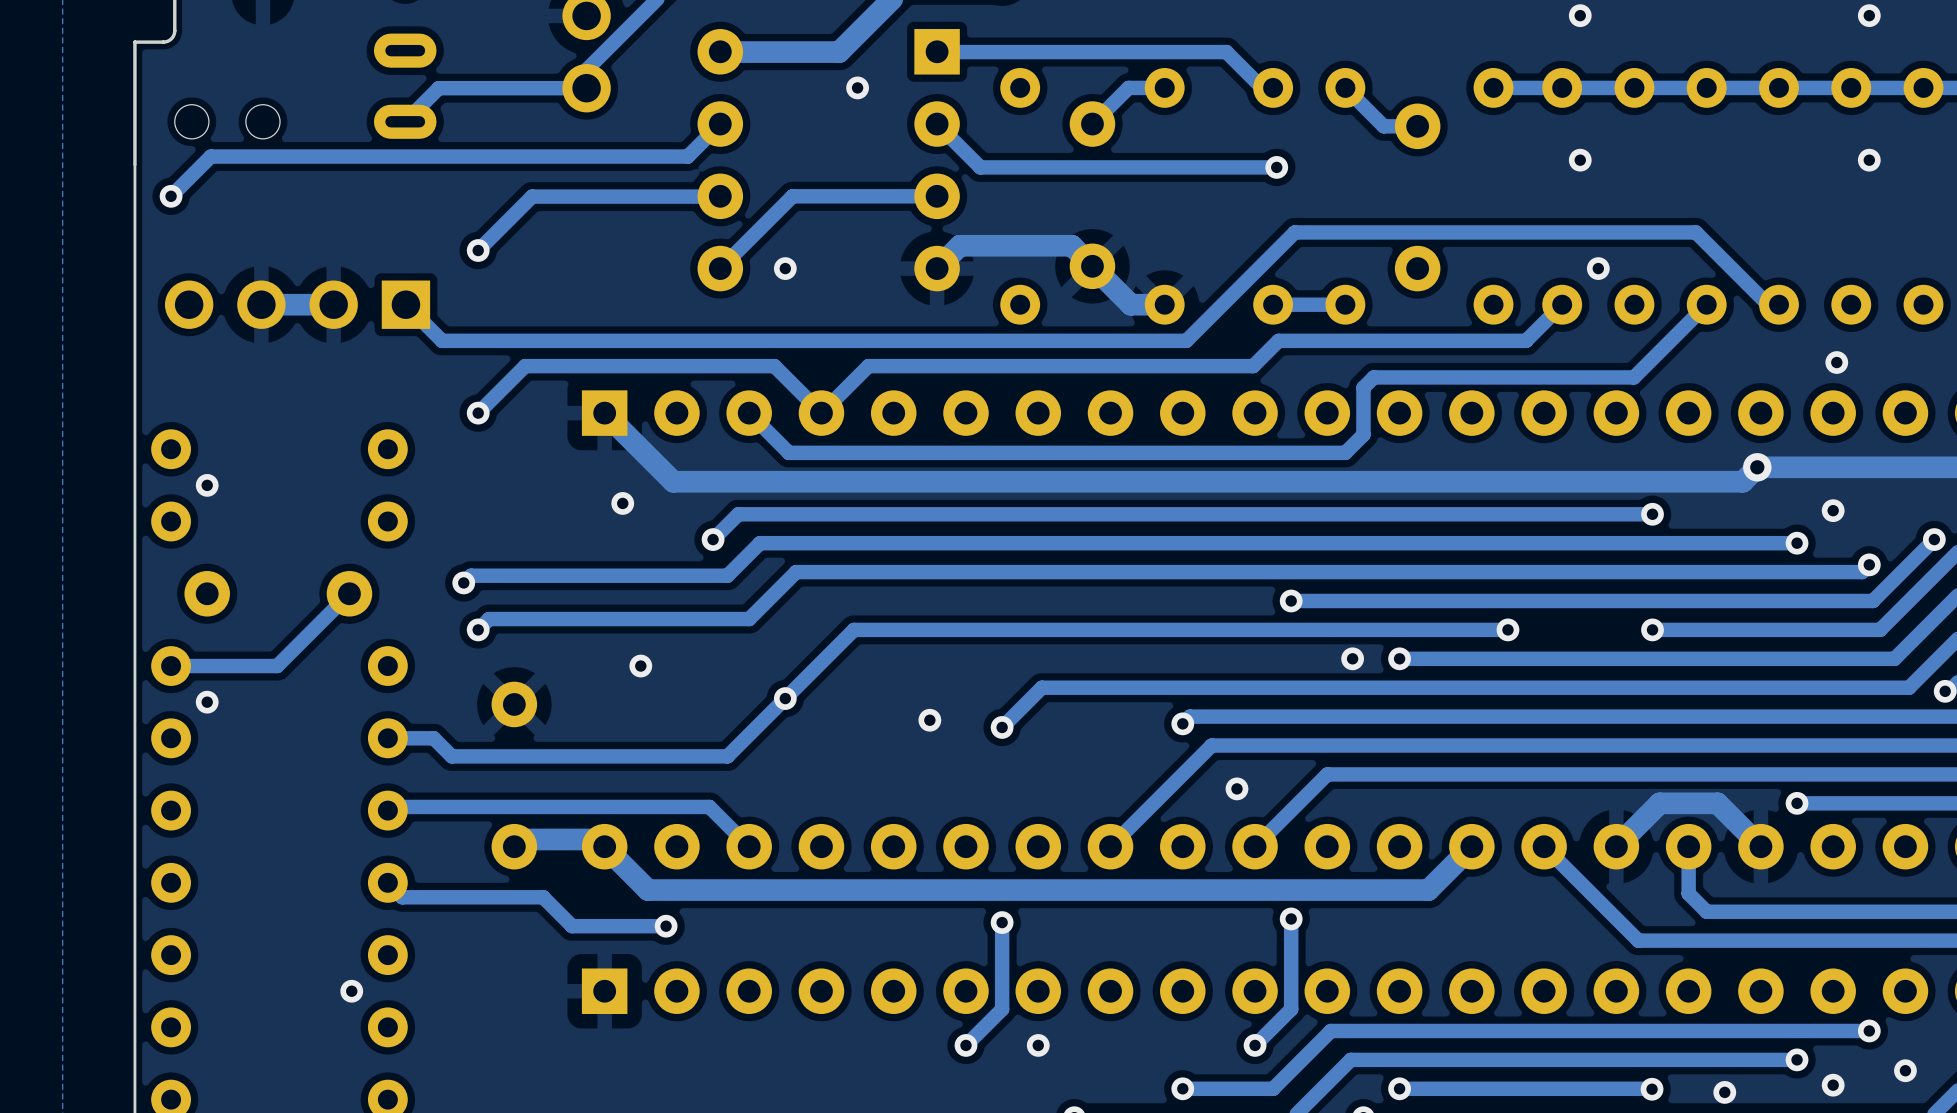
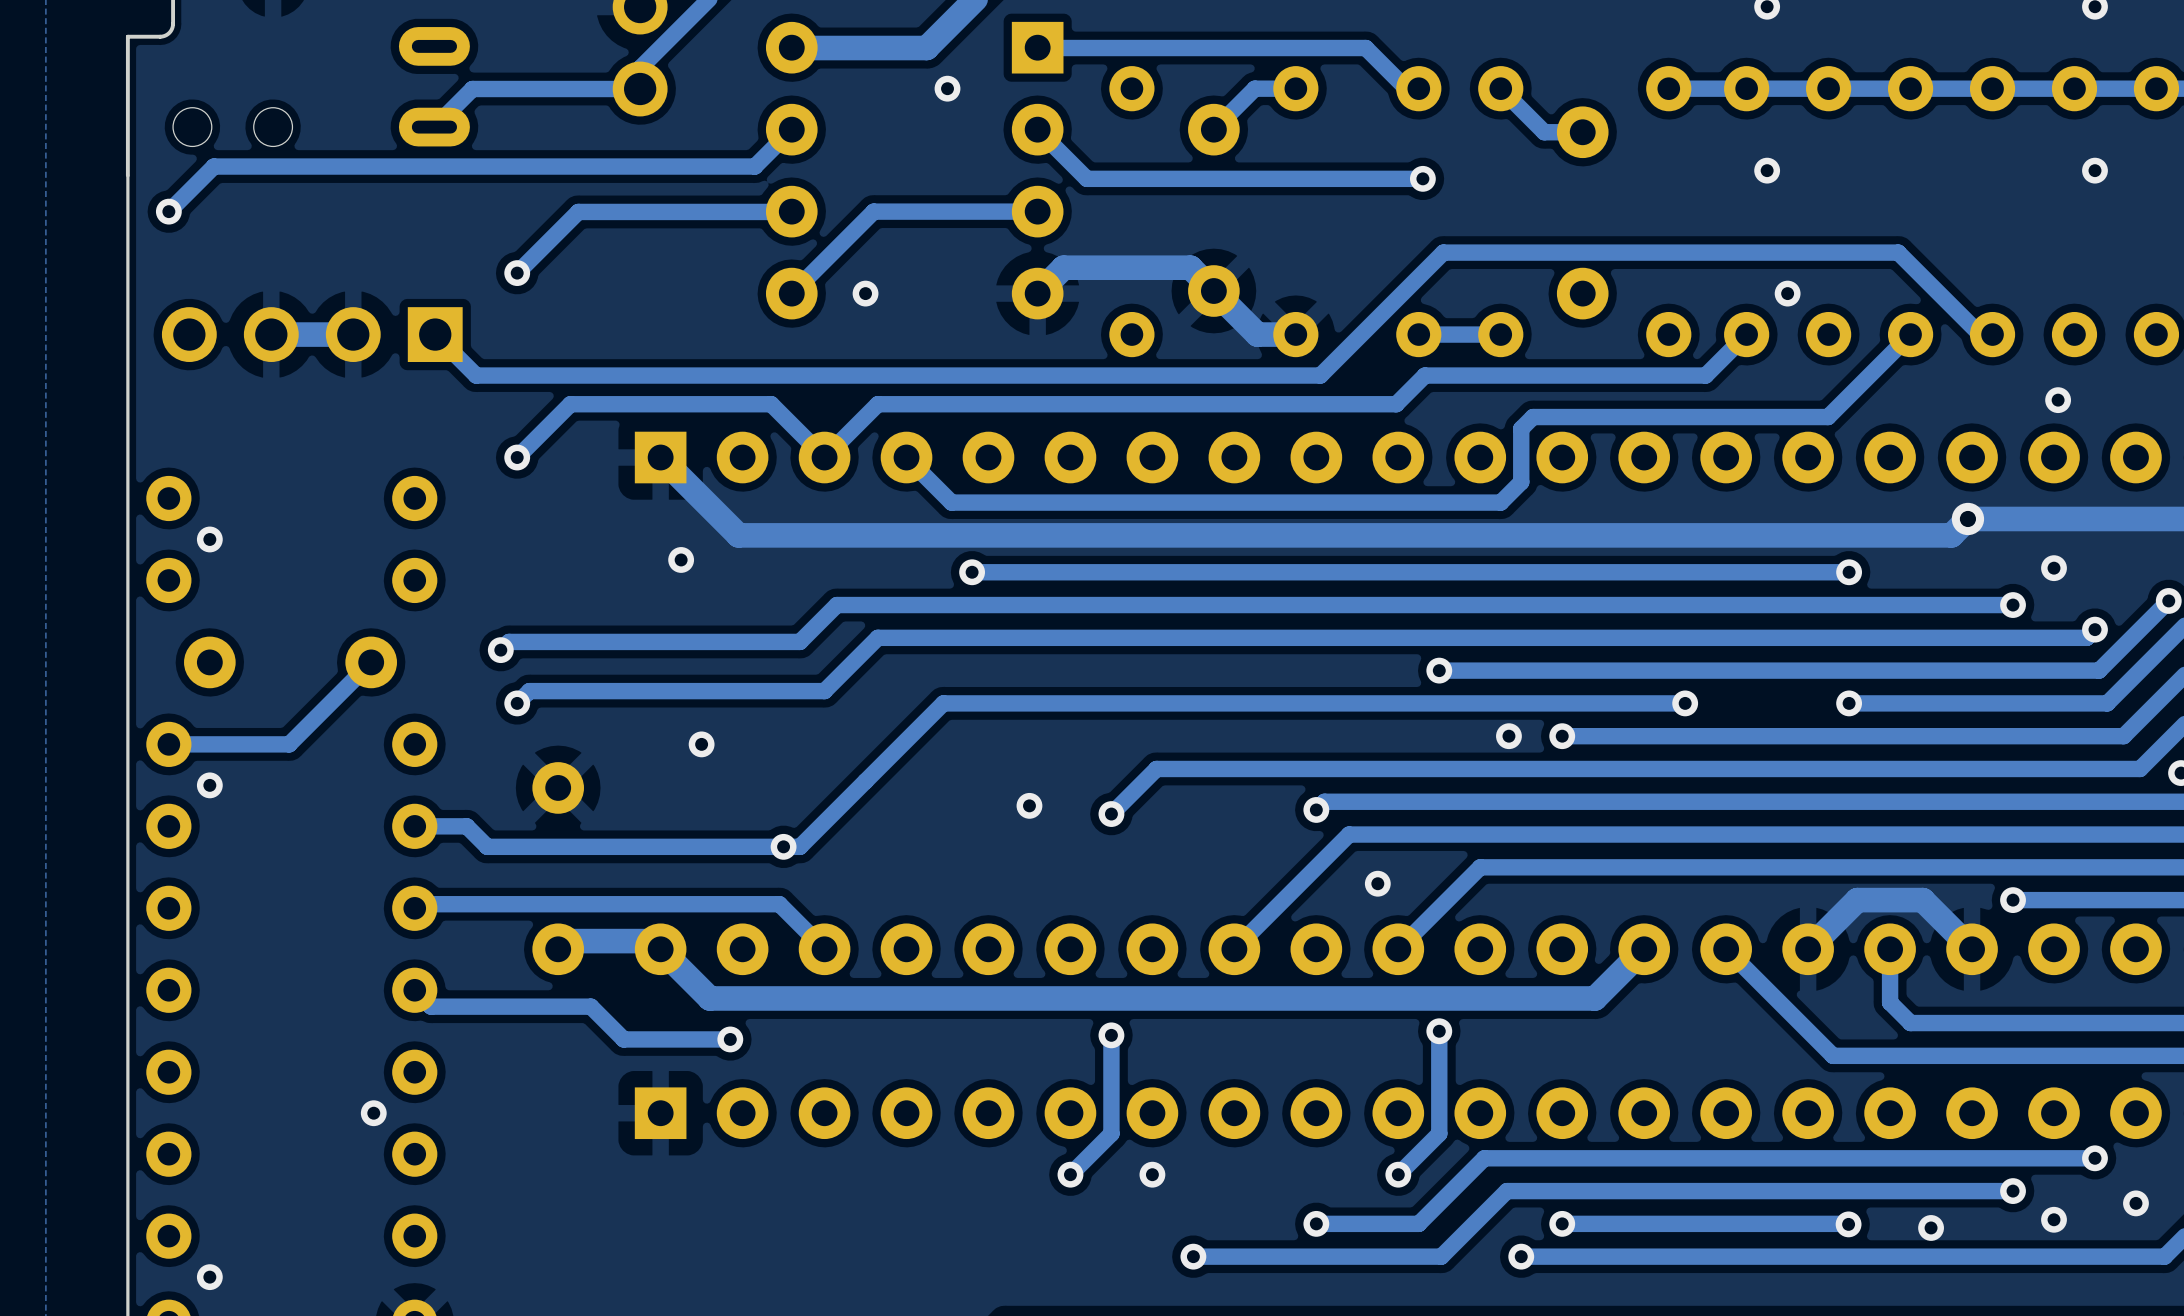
track: (868, 366) (821, 413) (774, 366) (702, 366) -> (959, 404) (877, 404) (824, 457) (771, 404)
track: (749, 413) (788, 452) (861, 452) -> (906, 457) (951, 502)
track: (879, 514) (738, 514) (713, 539) -> none
via: none -> (972, 572)
via: (713, 539) -> none
via position: (785, 698) -> (783, 846)

